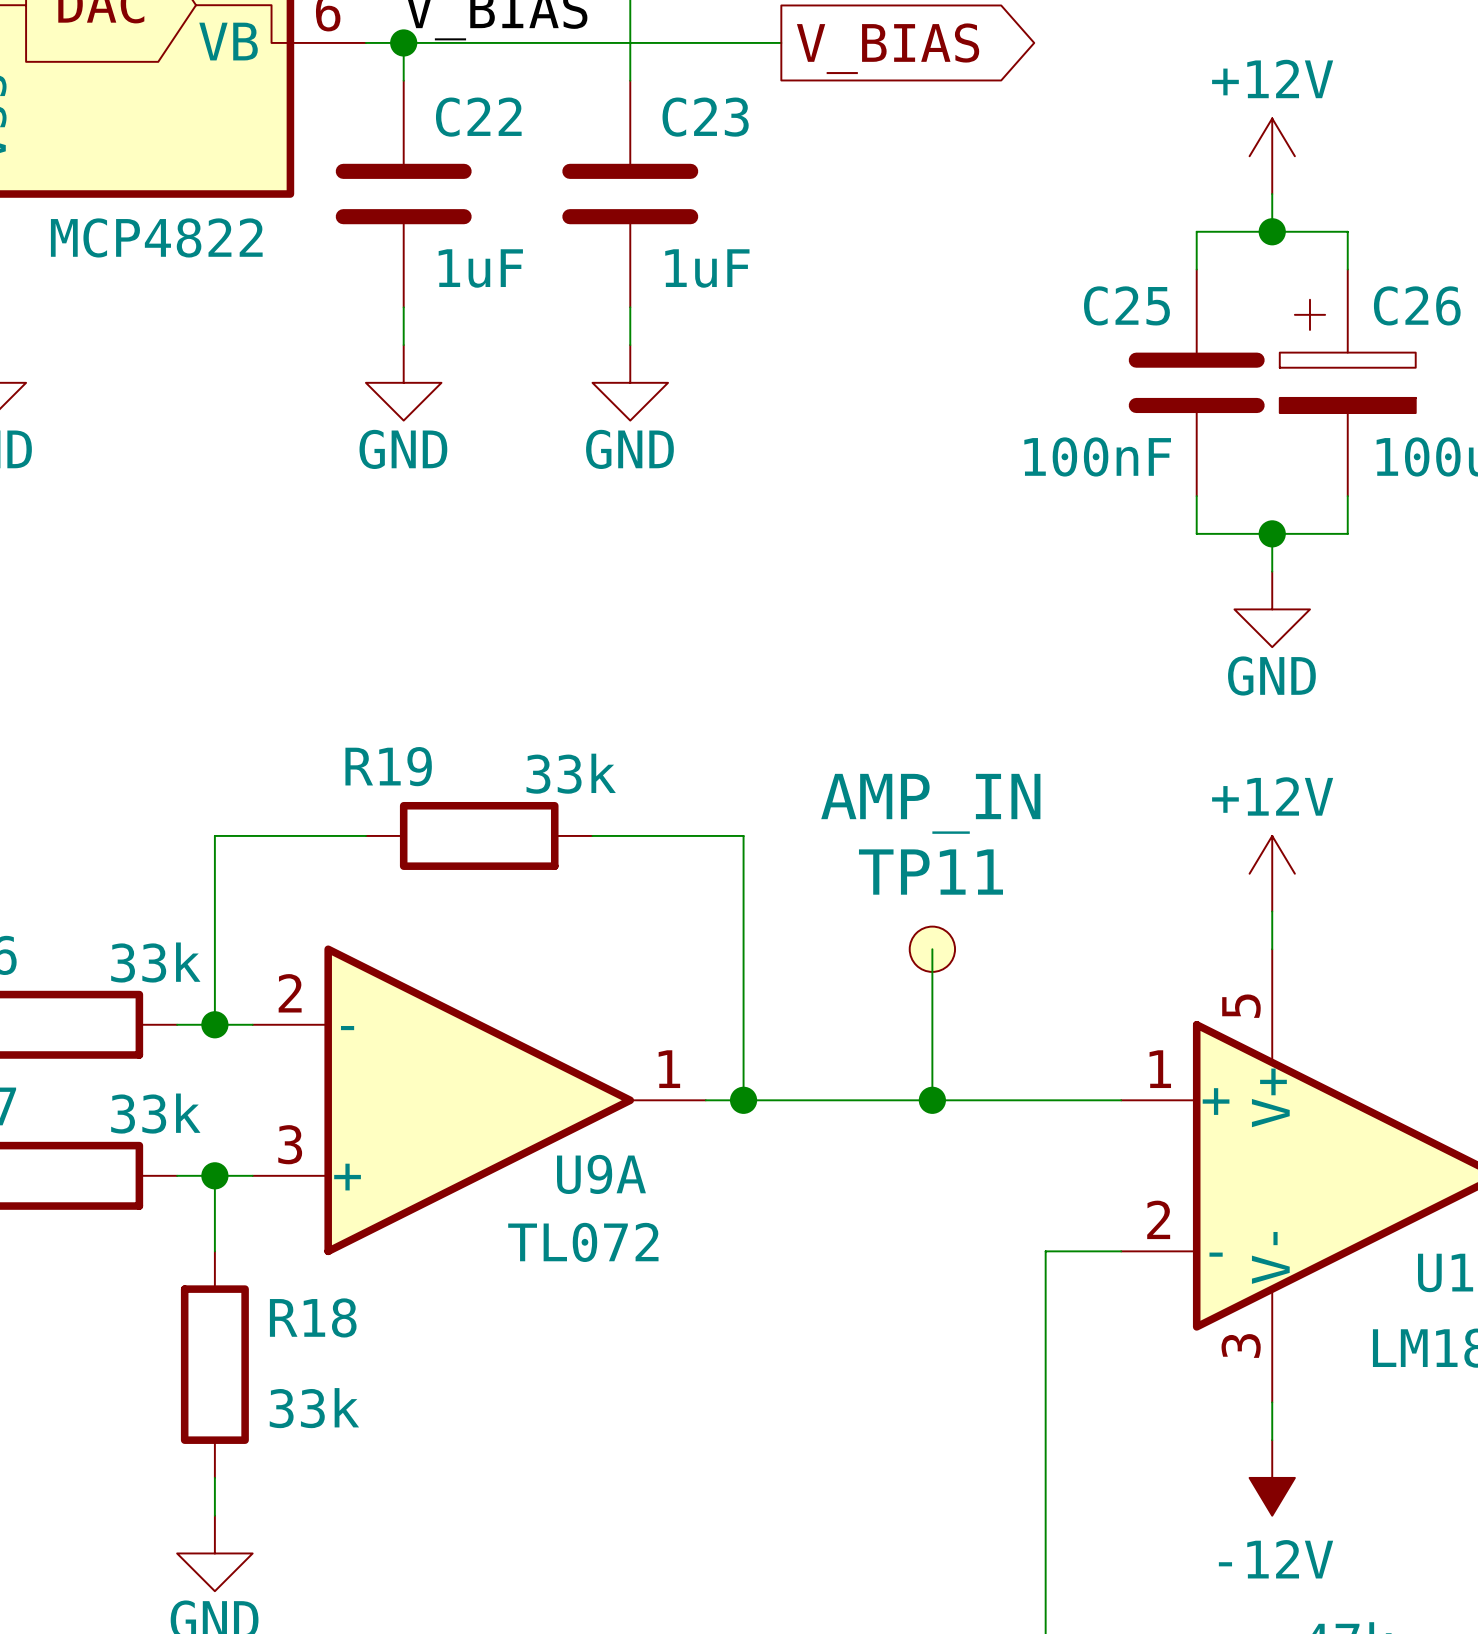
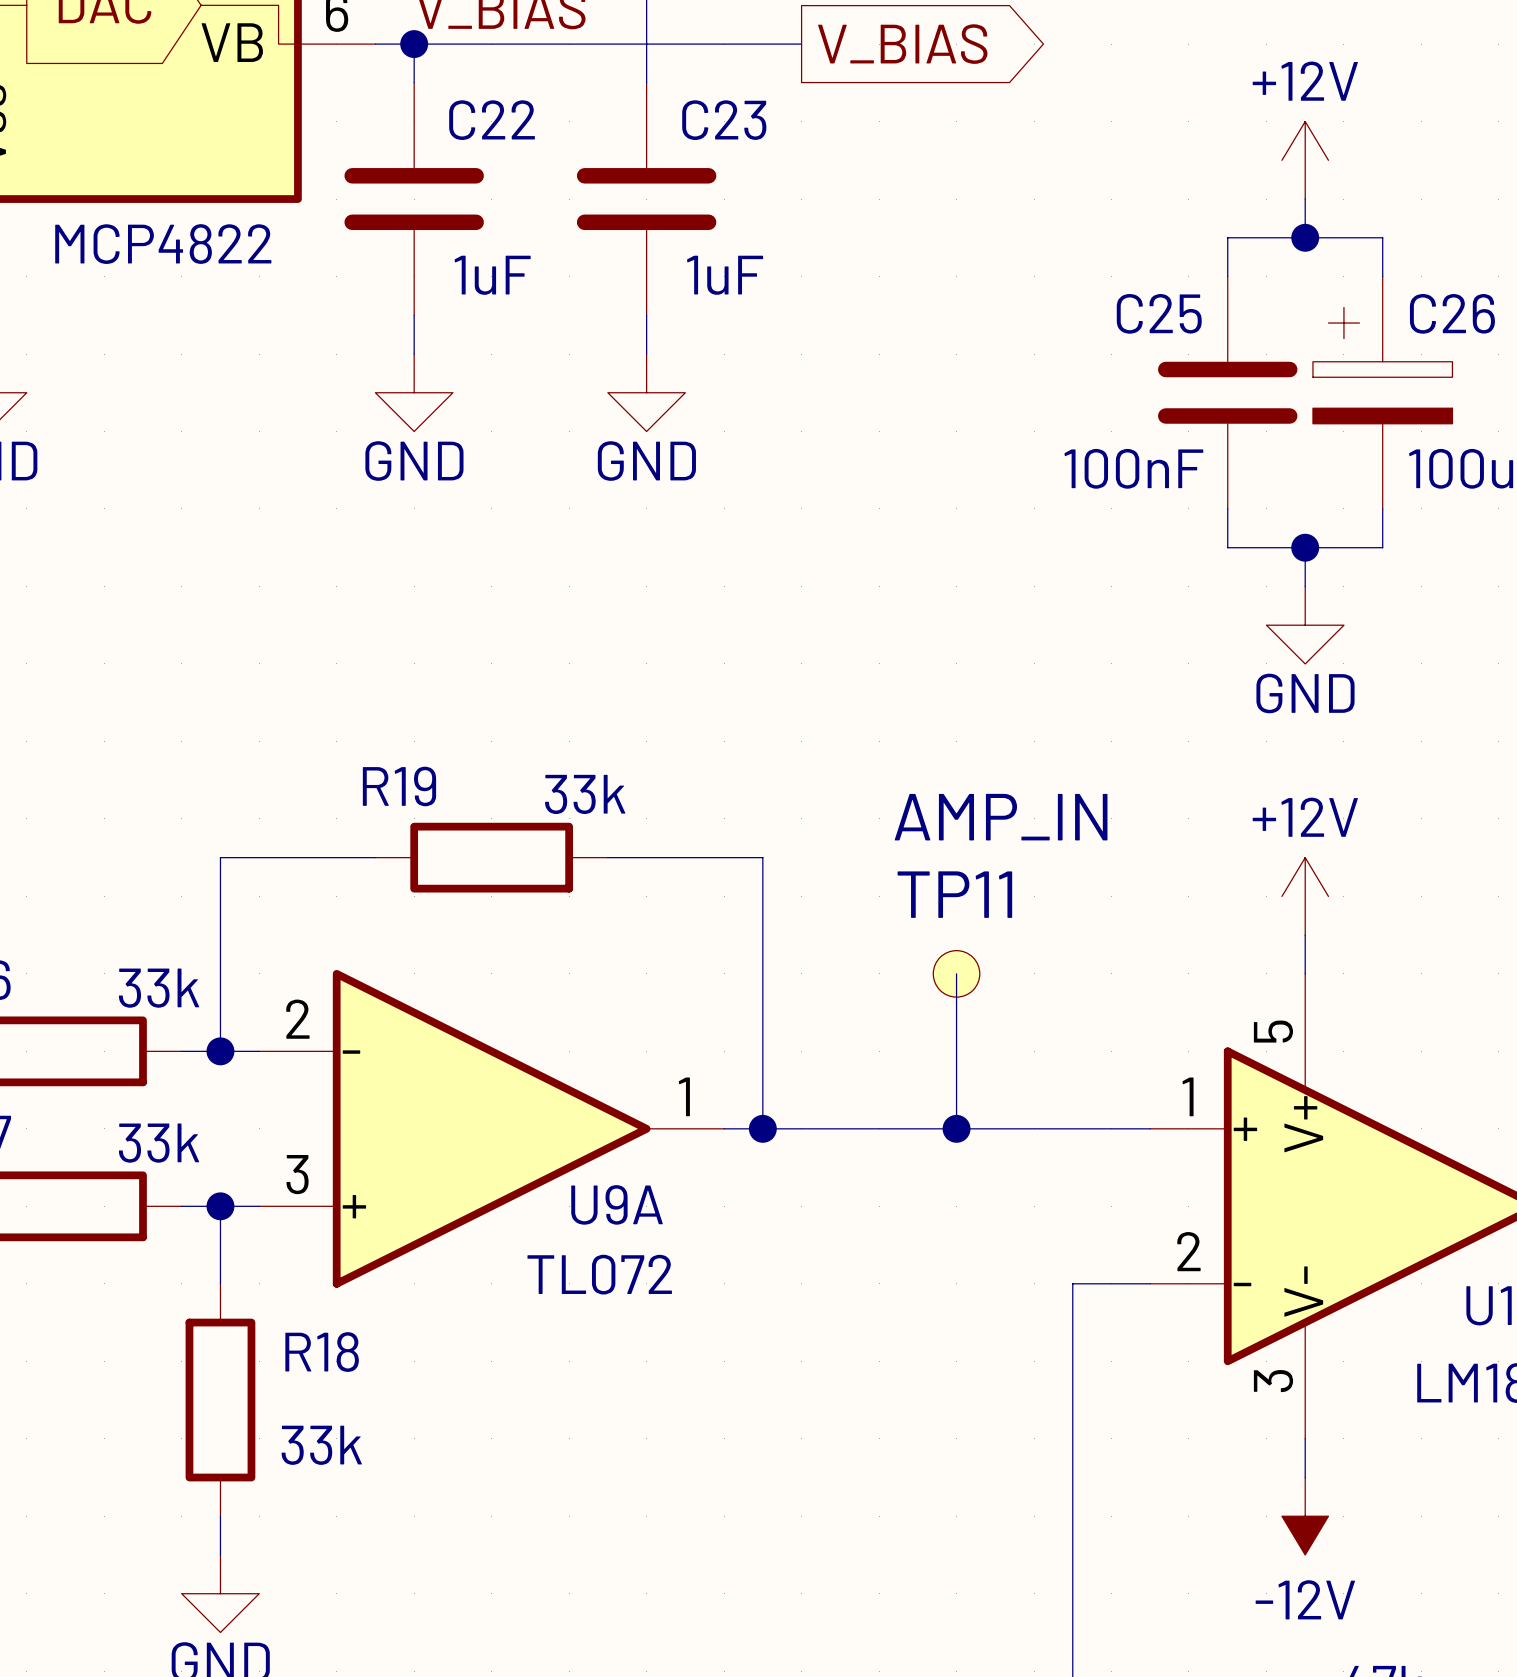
TP11 value position: AMP_IN (930, 803) -> AMP_IN (1001, 817)

